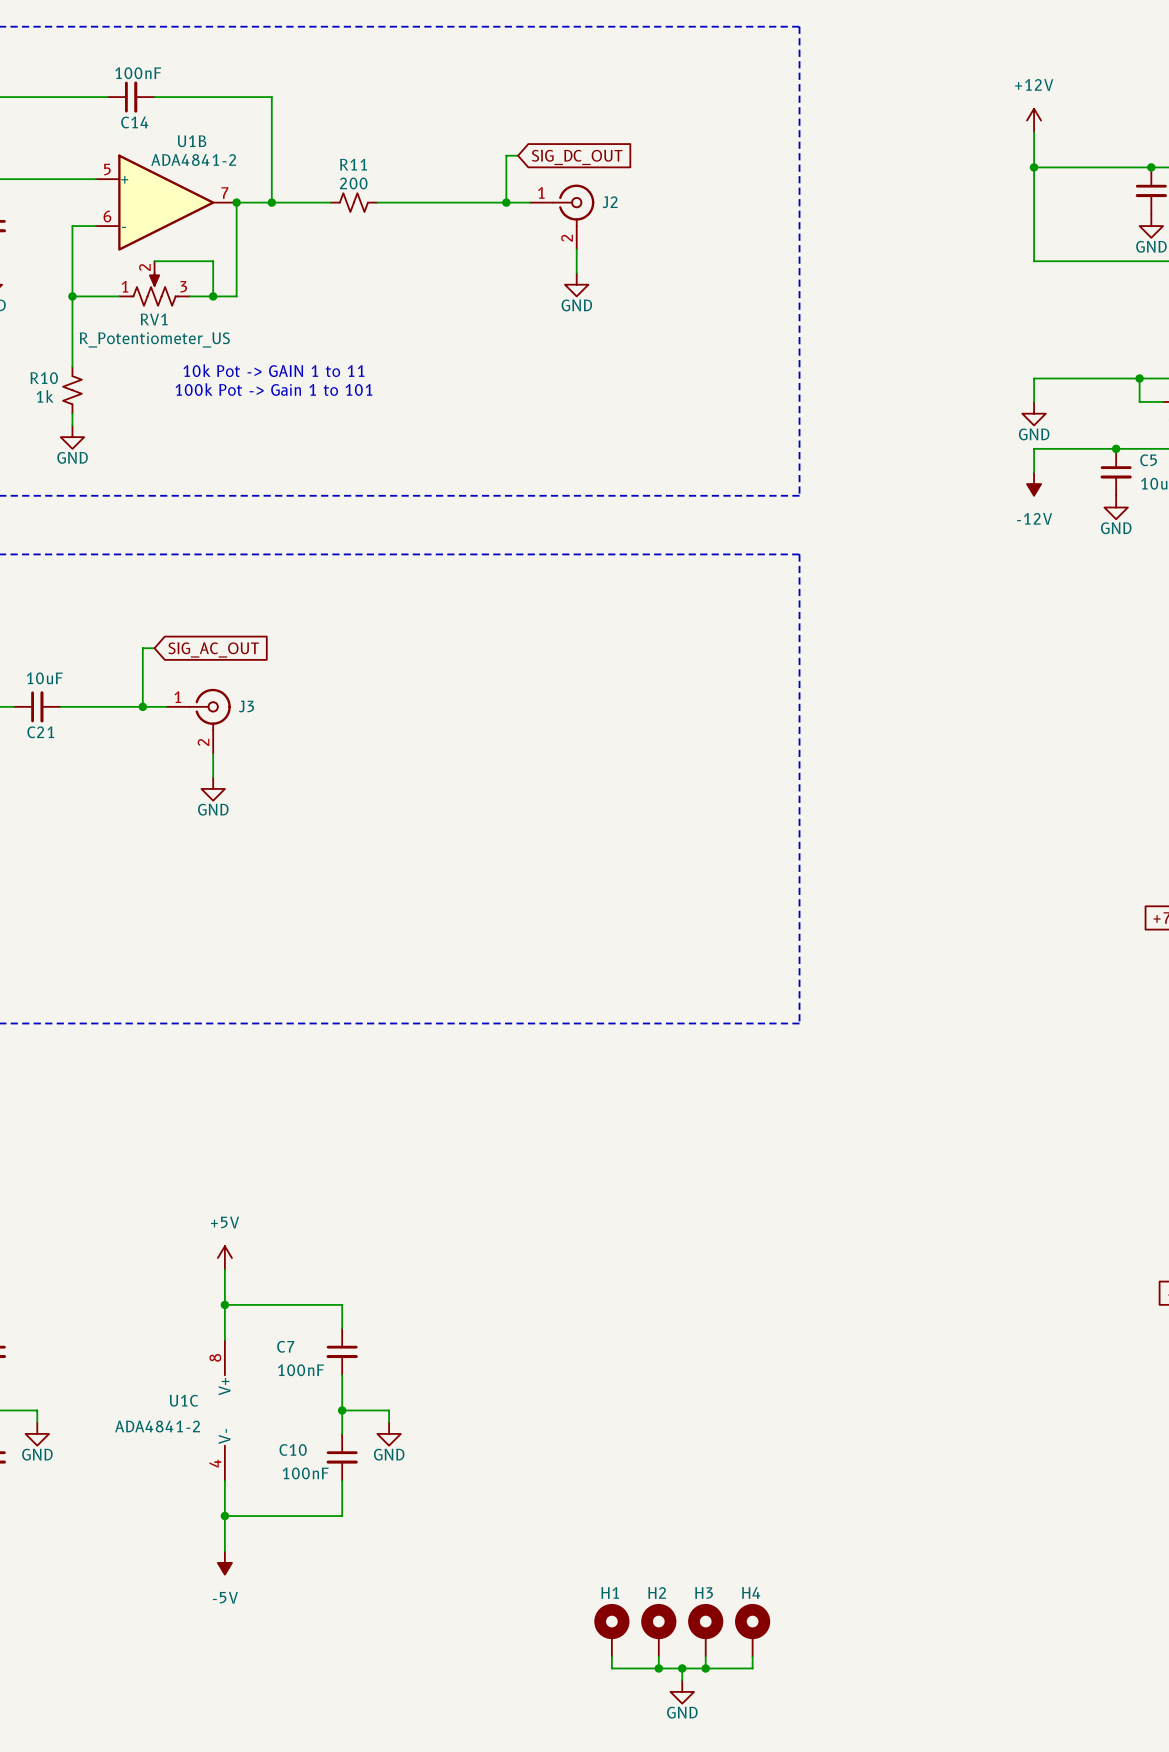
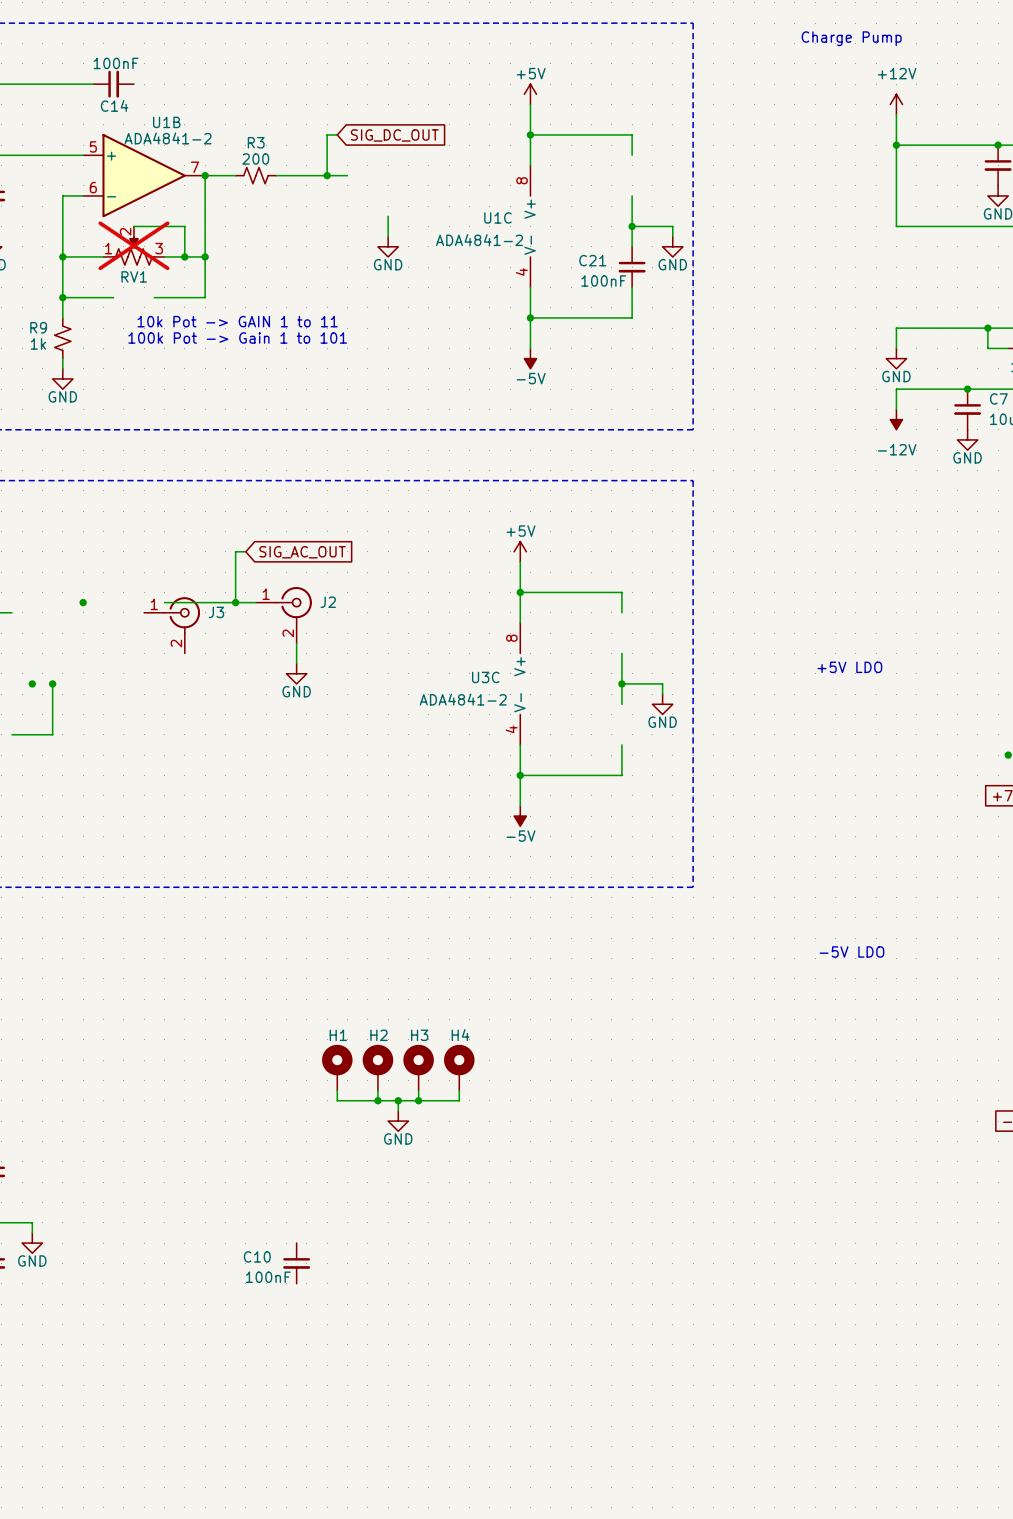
text: none -> Charge Pump (851, 38)
wire: (154, 97) (271, 97) (271, 202) (318, 202) -> none
power symbol: none -> +5V (530, 94)
wire: none -> (530, 104) (530, 165)
wire: none -> (337, 134) (327, 134) (327, 175) (286, 175)
wire: (518, 155) (506, 155) (506, 202) -> none
wire: none -> (530, 134) (632, 134) (632, 155)
junction: none -> (530, 134)
global label position: SIG_DC_OUT (577, 157) -> SIG_DC_OUT (394, 135)
junction: (271, 202) -> none
R3: none -> 200 (255, 175)
R11: 200 (353, 202) -> none
junction: none -> (327, 175)
wire: (400, 202) (529, 202) -> none
junction: (506, 202) -> none
J2 position: (562, 217) -> (283, 615)
wire: none -> (632, 195) (632, 246)
wire: (576, 249) (576, 272) -> (388, 216) (388, 236)
wire: none -> (632, 226) (672, 226) (672, 236)
junction: none -> (632, 226)
RV1 do-not-place cross: none -> (133, 245)
power symbol: none -> GND (388, 246)
power symbol: GND (576, 284) -> none
power symbol: none -> GND (672, 246)
wire: none -> (205, 256) (205, 297) (154, 297)
junction: none -> (205, 256)
wire: none -> (530, 287) (530, 348)
wire: none -> (632, 287) (632, 317) (530, 317)
RV1 value: R_Potentiometer_US (154, 339) -> none
wire: none -> (62, 297) (113, 297)
junction: none -> (62, 297)
junction: none -> (530, 317)
R10 name: R10 (44, 378) -> R9 (38, 327)
power symbol: none -> -5V (530, 358)
C5 name: C5 (1148, 460) -> C7 (998, 398)
power symbol: none -> +5V (520, 551)
wire: (154, 648) (142, 648) (142, 706) -> (245, 551) (235, 551) (235, 602)
wire: none -> (520, 561) (520, 622)
global label position: SIG_AC_OUT (213, 649) -> SIG_AC_OUT (302, 552)
C21 value: 10uF (44, 678) -> 100nF (603, 280)
wire: none -> (520, 592) (621, 592) (621, 612)
junction: none -> (520, 592)
junction: none -> (235, 602)
C21 rotation: 0° (37, 706) -> 90° clockwise (632, 267)
C21 position: (37, 706) -> (632, 267)
wire: (60, 706) (166, 706) -> (164, 602) (255, 602)
junction position: (142, 706) -> (83, 602)
wire: (213, 753) (213, 777) -> (296, 643) (296, 663)
wire: none -> (621, 653) (621, 704)
text: none -> +5V LDO (849, 667)
junction: none -> (32, 683)
wire: none -> (52, 683) (52, 734) (11, 734)
junction: none -> (52, 683)
power symbol position: GND (213, 788) -> GND (296, 673)
U3C: none -> ADA4841-2 (520, 683)
wire: none -> (621, 683) (662, 683) (662, 694)
junction: none -> (621, 683)
power symbol: none -> GND (662, 704)
wire: none -> (520, 744) (520, 805)
wire: none -> (621, 744) (621, 775) (520, 775)
junction: none -> (1008, 755)
junction: none -> (520, 775)
power symbol: none -> -5V (520, 816)
text: none -> -5V LDO (851, 951)
power symbol: +5V (224, 1258) -> none
wire: none -> (337, 1090) (337, 1100) (459, 1100) (459, 1090)
wire: none -> (377, 1090) (377, 1100)
wire: none -> (418, 1090) (418, 1100)
wire: (224, 1269) (224, 1340) -> none
junction: none -> (377, 1100)
wire: none -> (398, 1100) (398, 1110)
junction: none -> (398, 1100)
junction: none -> (418, 1100)
wire: (224, 1304) (342, 1304) (342, 1328) -> none
junction: (224, 1304) -> none
C7: 100nF (342, 1351) -> none
wire: (342, 1375) (342, 1433) -> none
U1C position: (224, 1410) -> (530, 226)
wire: (342, 1410) (389, 1410) (389, 1422) -> none
junction: (342, 1410) -> none
power symbol position: GND (389, 1433) -> GND (398, 1121)
wire: (224, 1480) (224, 1551) -> none
wire: (342, 1480) (342, 1516) (224, 1516) -> none
junction: (224, 1516) -> none
power symbol: -5V (224, 1562) -> none
H1 position: (611, 1630) -> (337, 1067)
H2 position: (658, 1630) -> (377, 1067)
H3 position: (705, 1630) -> (418, 1067)
H4 position: (752, 1630) -> (459, 1067)
wire: (611, 1656) (611, 1668) (752, 1668) (752, 1656) -> none
wire: (658, 1656) (658, 1668) -> none
wire: (705, 1656) (705, 1668) -> none
junction: (658, 1668) -> none
wire: (682, 1668) (682, 1680) -> none
junction: (682, 1668) -> none
junction: (705, 1668) -> none
power symbol: GND (682, 1691) -> none

